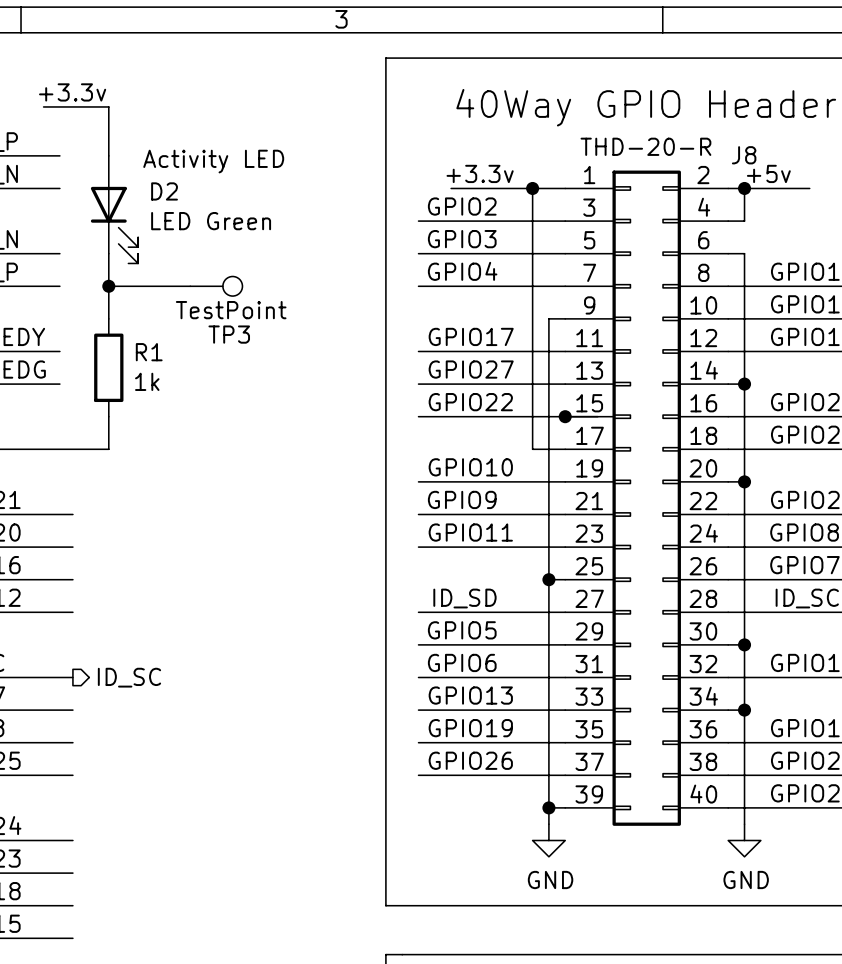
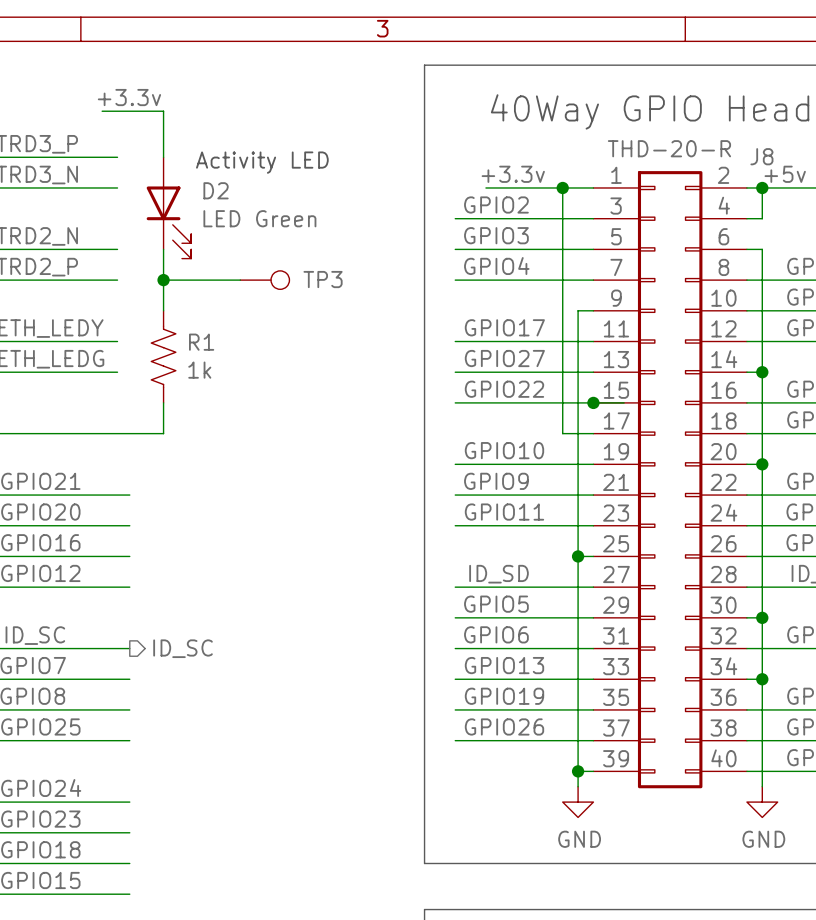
TP3 value: TestPoint (231, 310) -> none
R1 symbol: [94, 318, 124, 417] -> [151, 310, 176, 403]
TP3 name position: TP3 (229, 334) -> TP3 (323, 279)

